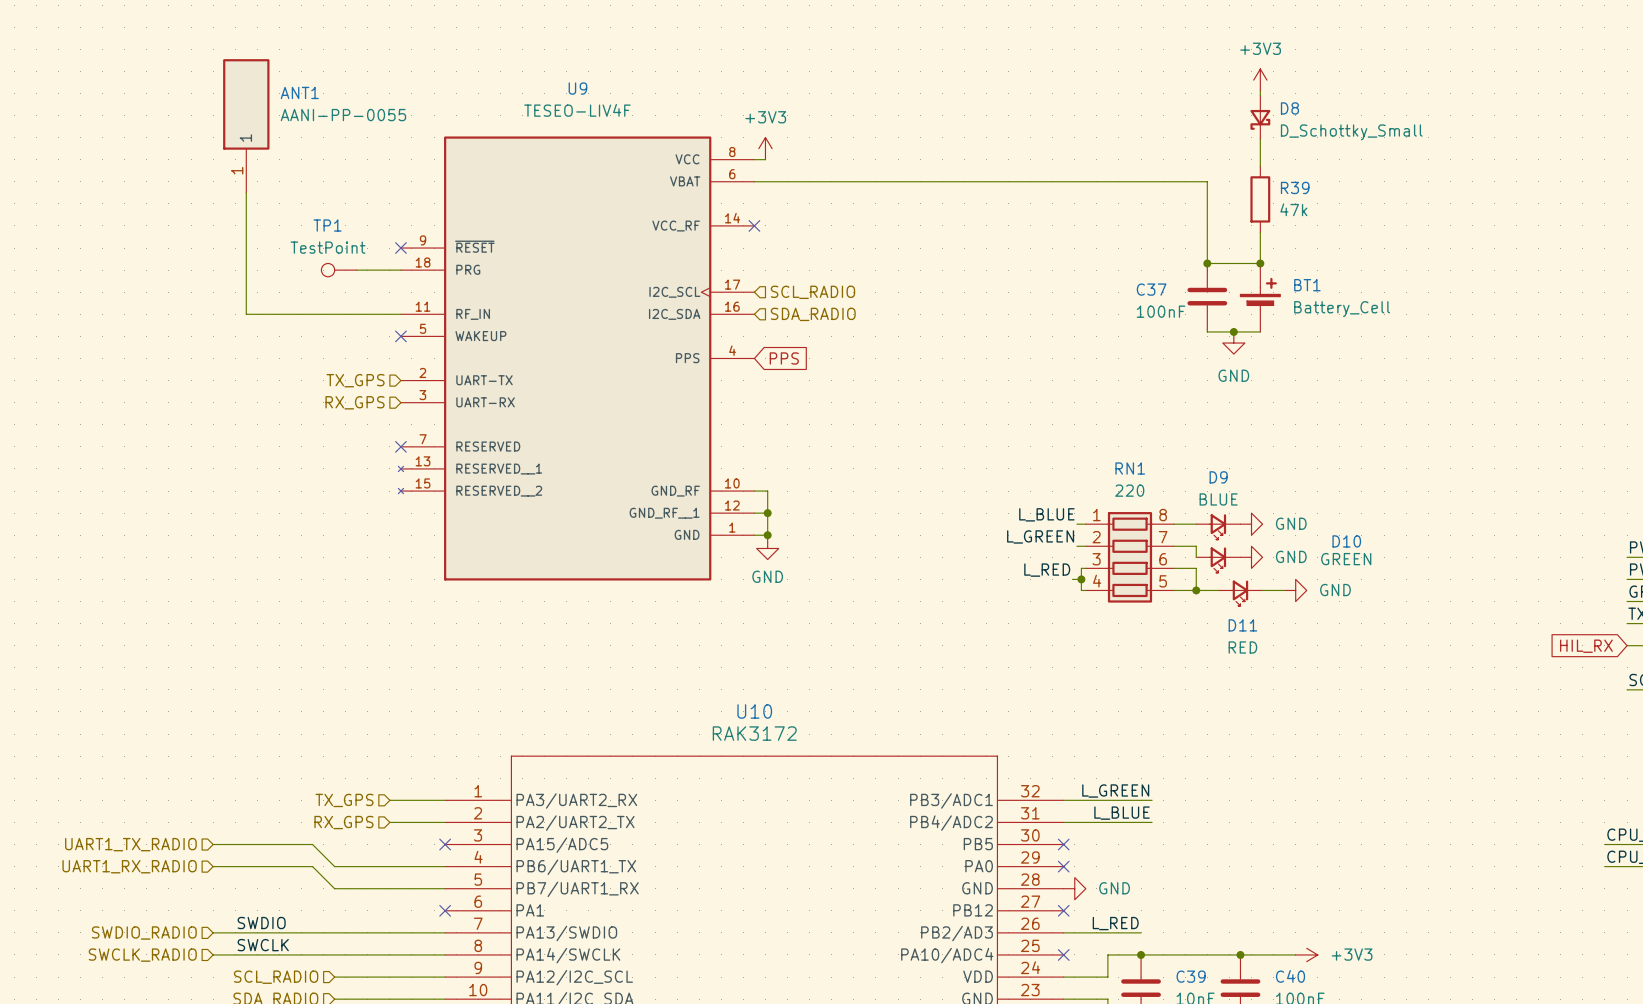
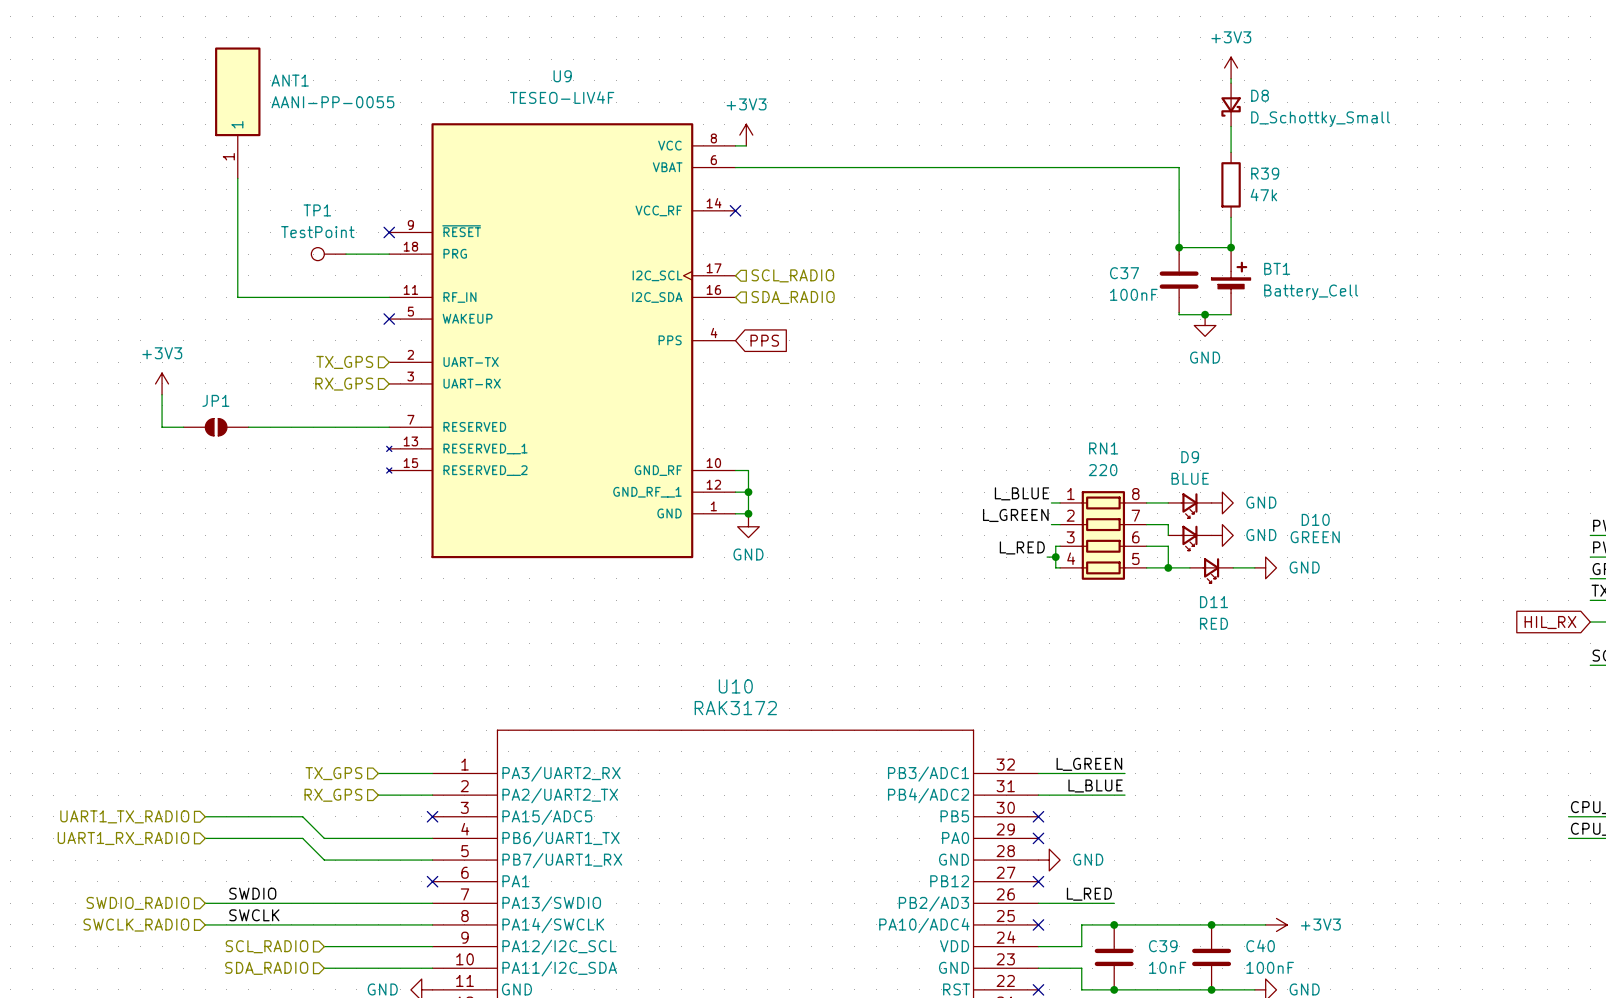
power symbol: none -> +3V3 (162, 383)
wire: none -> (162, 394) (162, 427) (183, 427)
JP1: none -> (216, 427)
wire: none -> (248, 427) (389, 427)
no-connect mark: (400, 446) -> none

